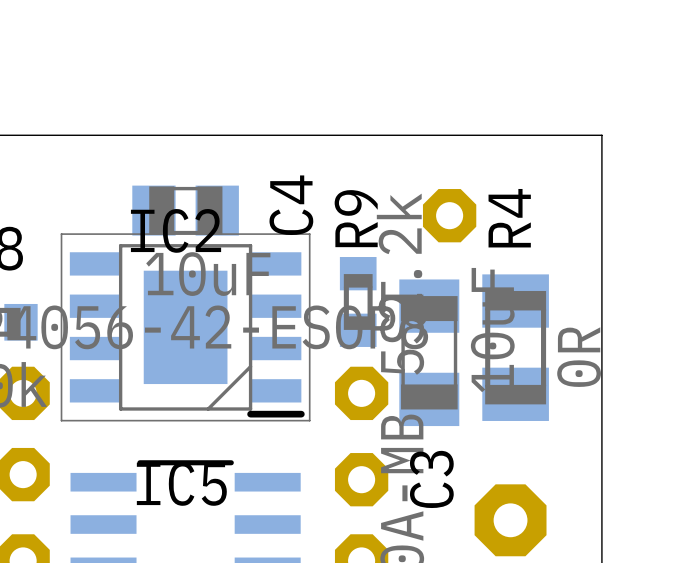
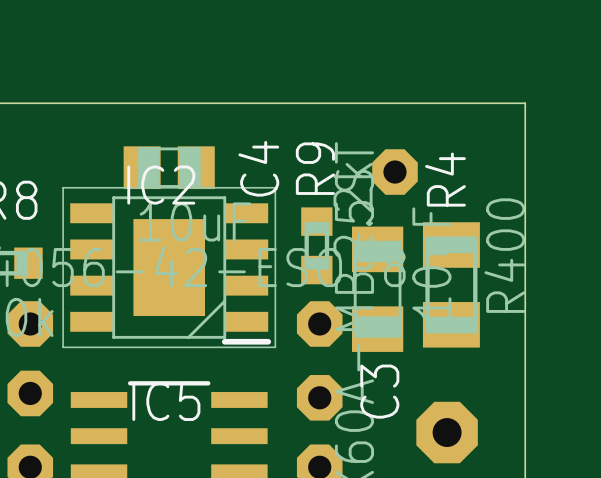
R4 value: 0R (579, 357) -> R400 (504, 255)

